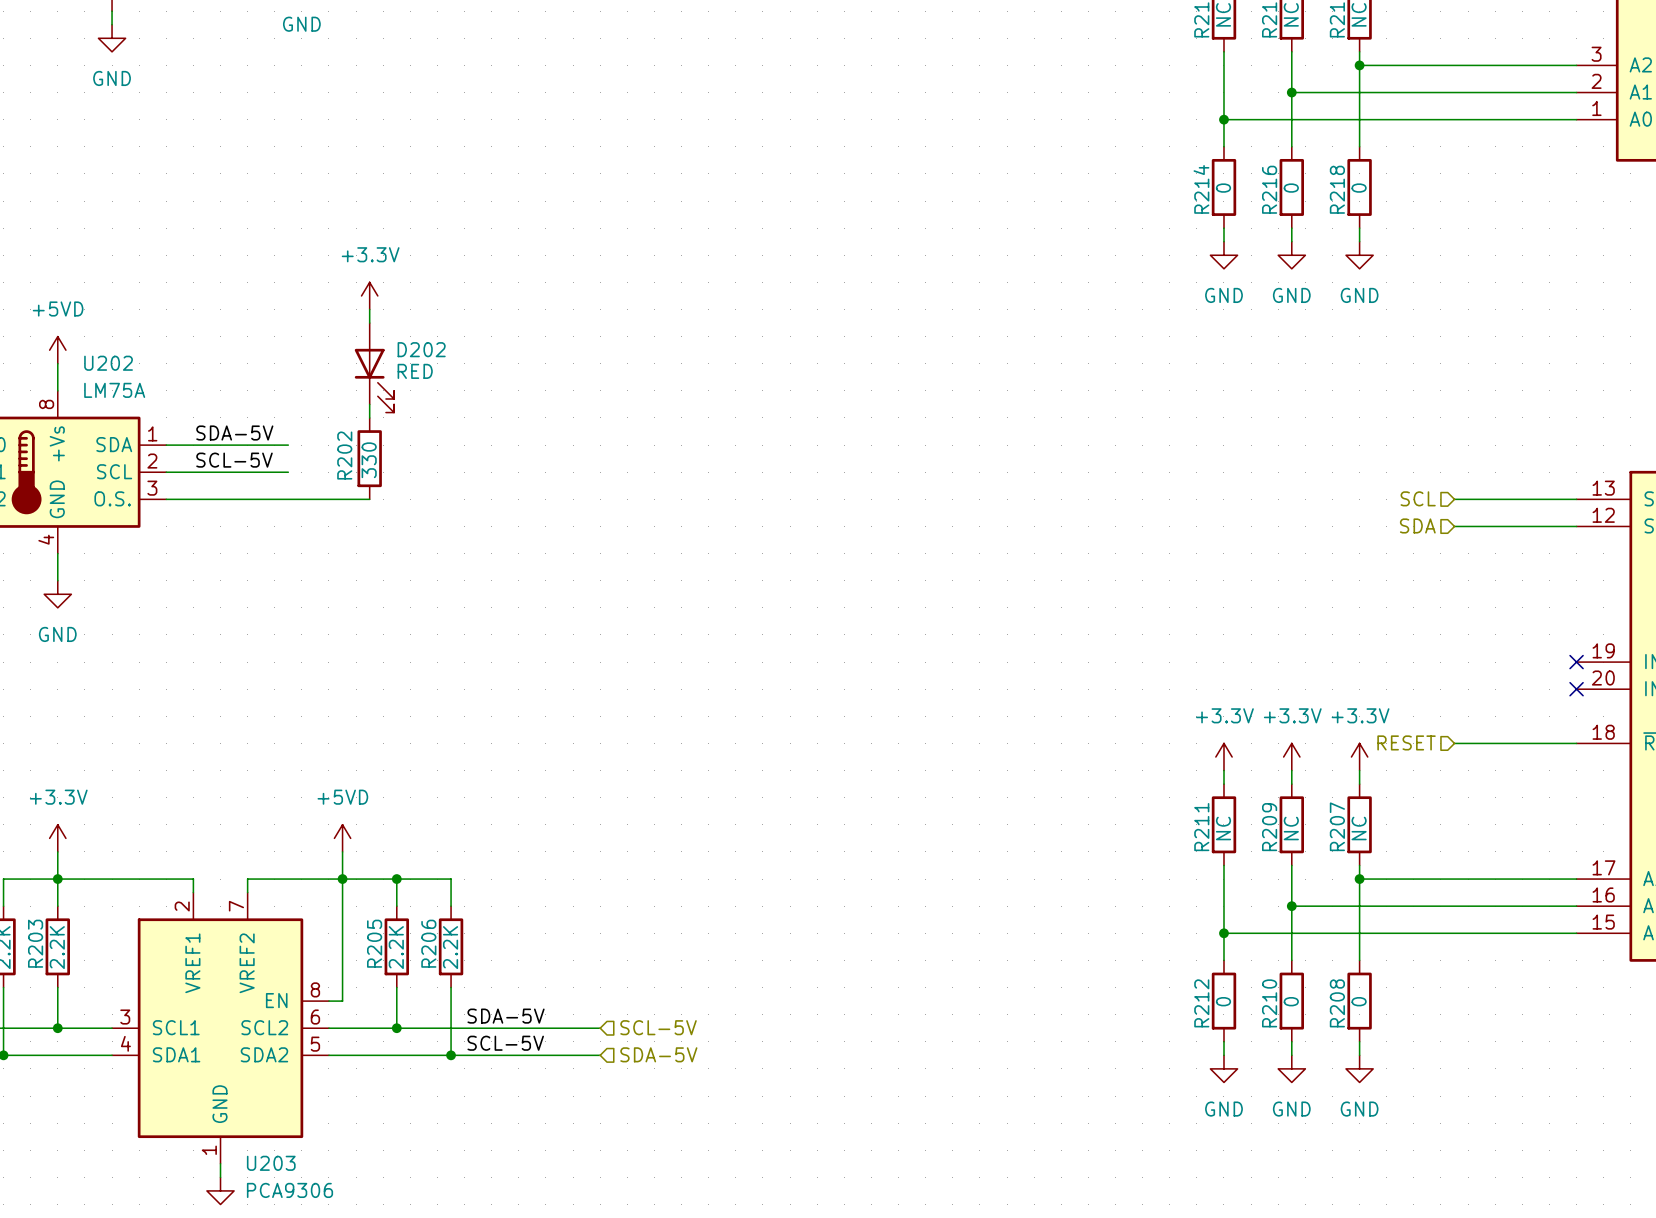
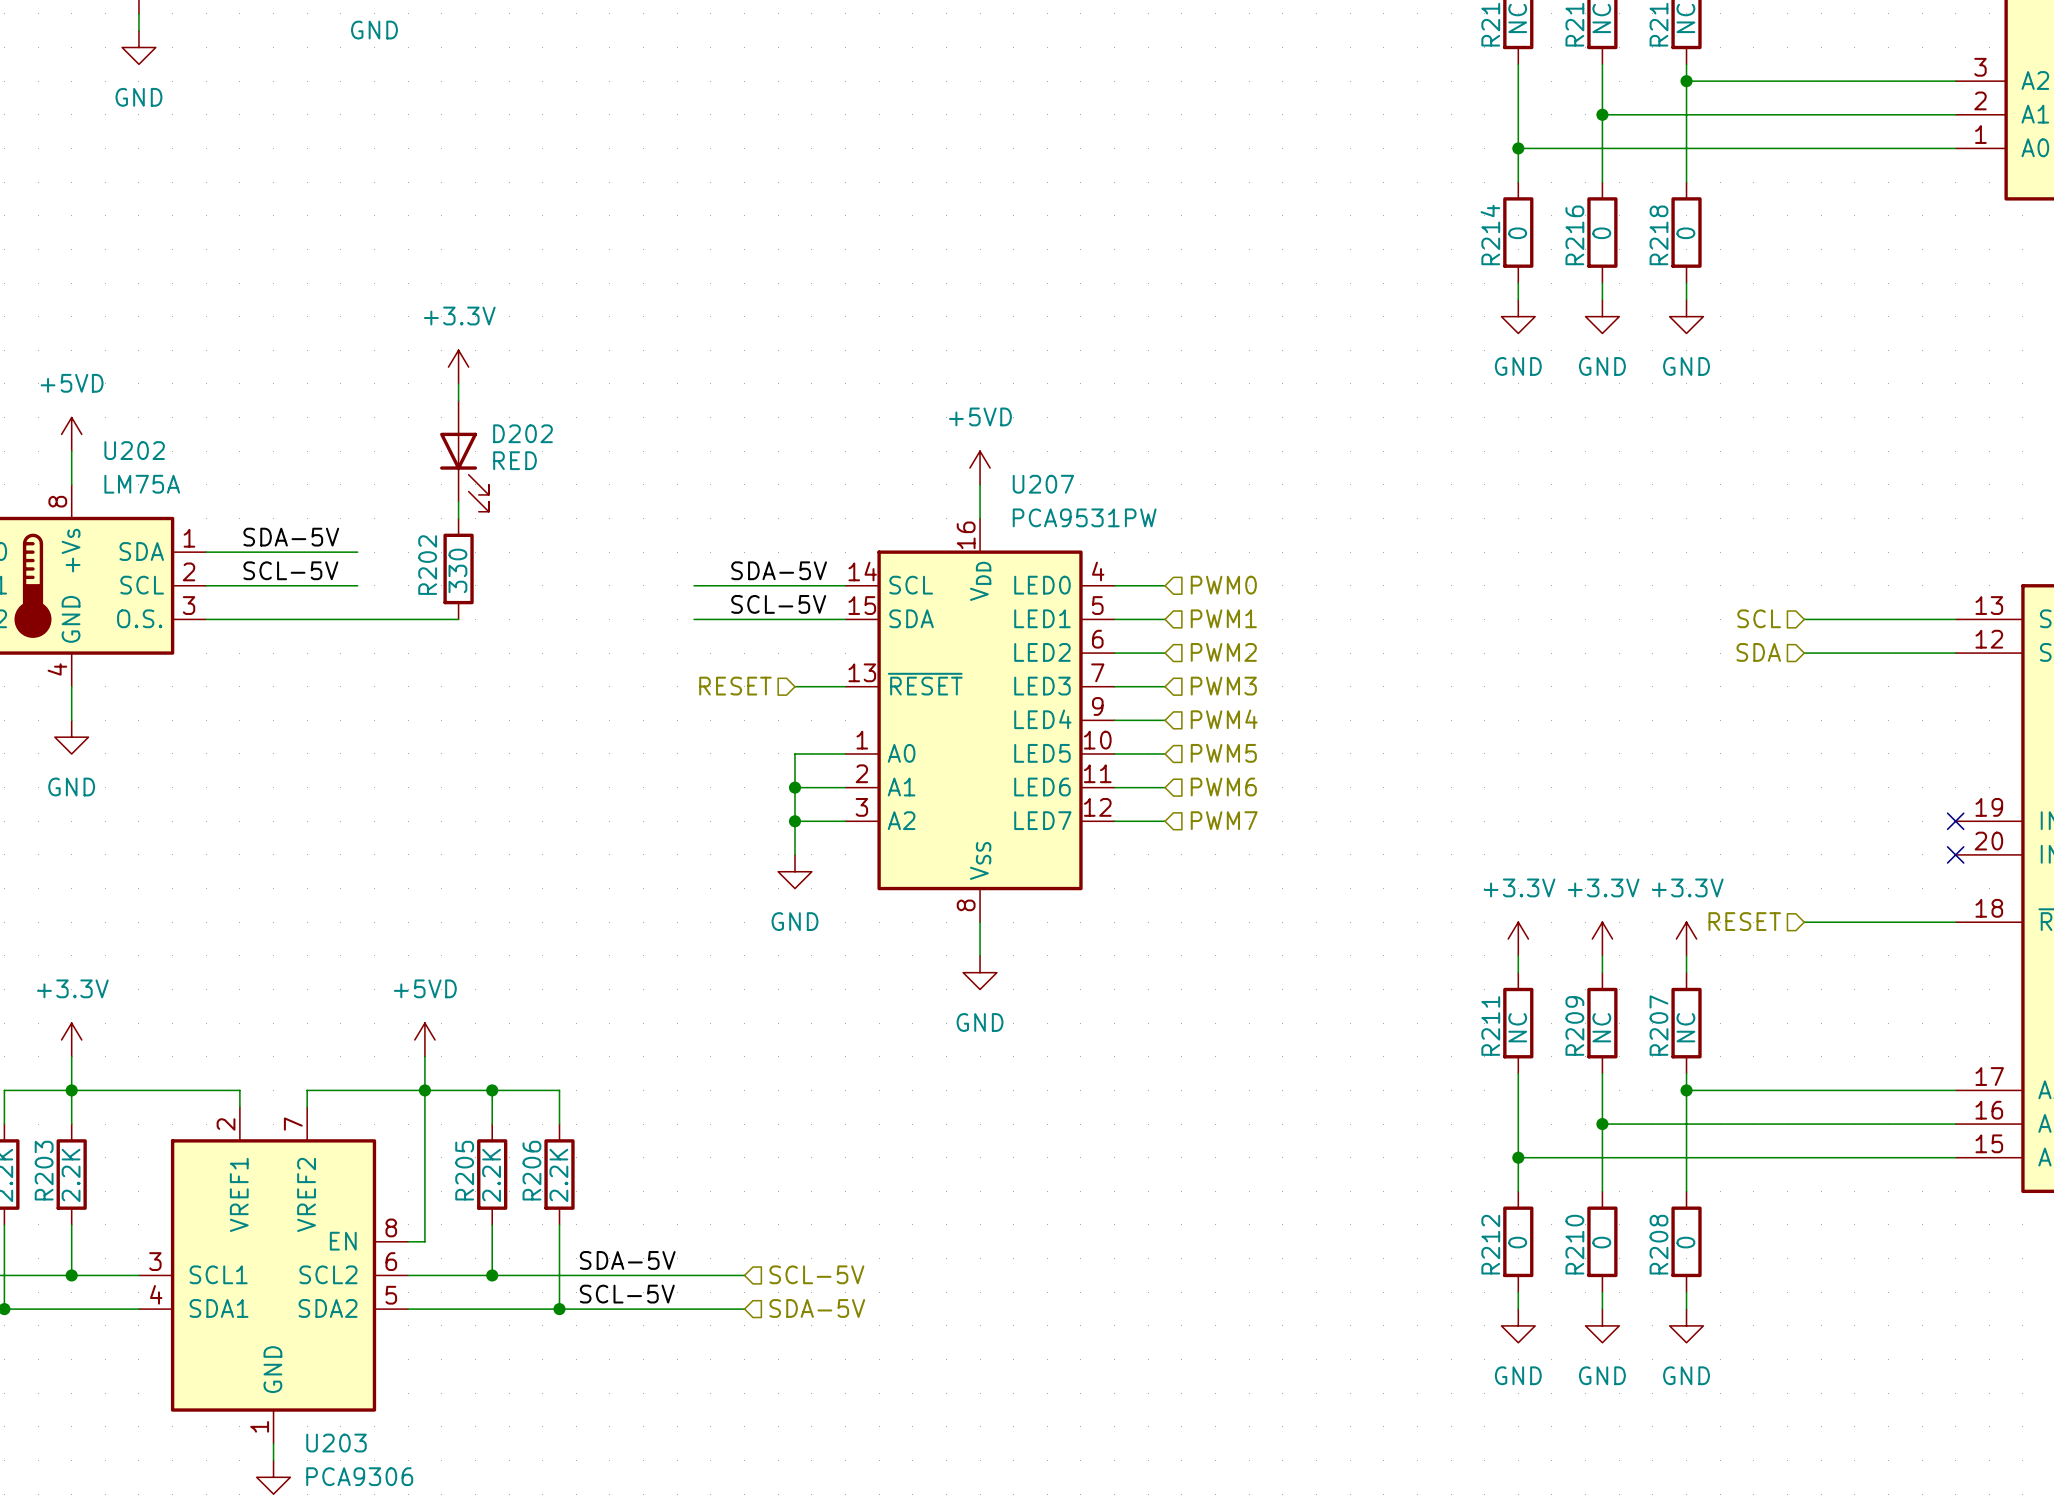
power symbol: none -> +5VD (980, 468)
wire: none -> (980, 484) (980, 518)
label: none -> SDA-5V (779, 570)
hierarchical label: none -> PWM0 (1223, 585)
wire: none -> (694, 585) (845, 585)
wire: none -> (1114, 585) (1165, 585)
label: none -> SCL-5V (778, 604)
hierarchical label: none -> PWM1 (1223, 618)
wire: none -> (694, 619) (845, 619)
wire: none -> (1114, 619) (1165, 619)
hierarchical label: none -> PWM2 (1223, 652)
wire: none -> (1114, 653) (1165, 653)
hierarchical label: none -> RESET (735, 686)
wire: none -> (794, 686) (845, 686)
wire: none -> (1114, 686) (1165, 686)
hierarchical label: none -> PWM3 (1223, 686)
hierarchical label: none -> PWM4 (1224, 719)
U207: none -> PCA9531PW (980, 720)
wire: none -> (1114, 720) (1165, 720)
wire: none -> (845, 753) (794, 753) (794, 854)
wire: none -> (1114, 753) (1165, 753)
hierarchical label: none -> PWM5 (1223, 753)
wire: none -> (794, 787) (845, 787)
junction: none -> (794, 787)
wire: none -> (1114, 787) (1165, 787)
hierarchical label: none -> PWM6 (1223, 787)
hierarchical label: none -> PWM7 (1224, 820)
wire: none -> (794, 821) (845, 821)
junction: none -> (794, 821)
wire: none -> (1114, 821) (1165, 821)
power symbol: none -> GND (794, 871)
wire: none -> (980, 922) (980, 955)
power symbol: none -> GND (980, 972)

